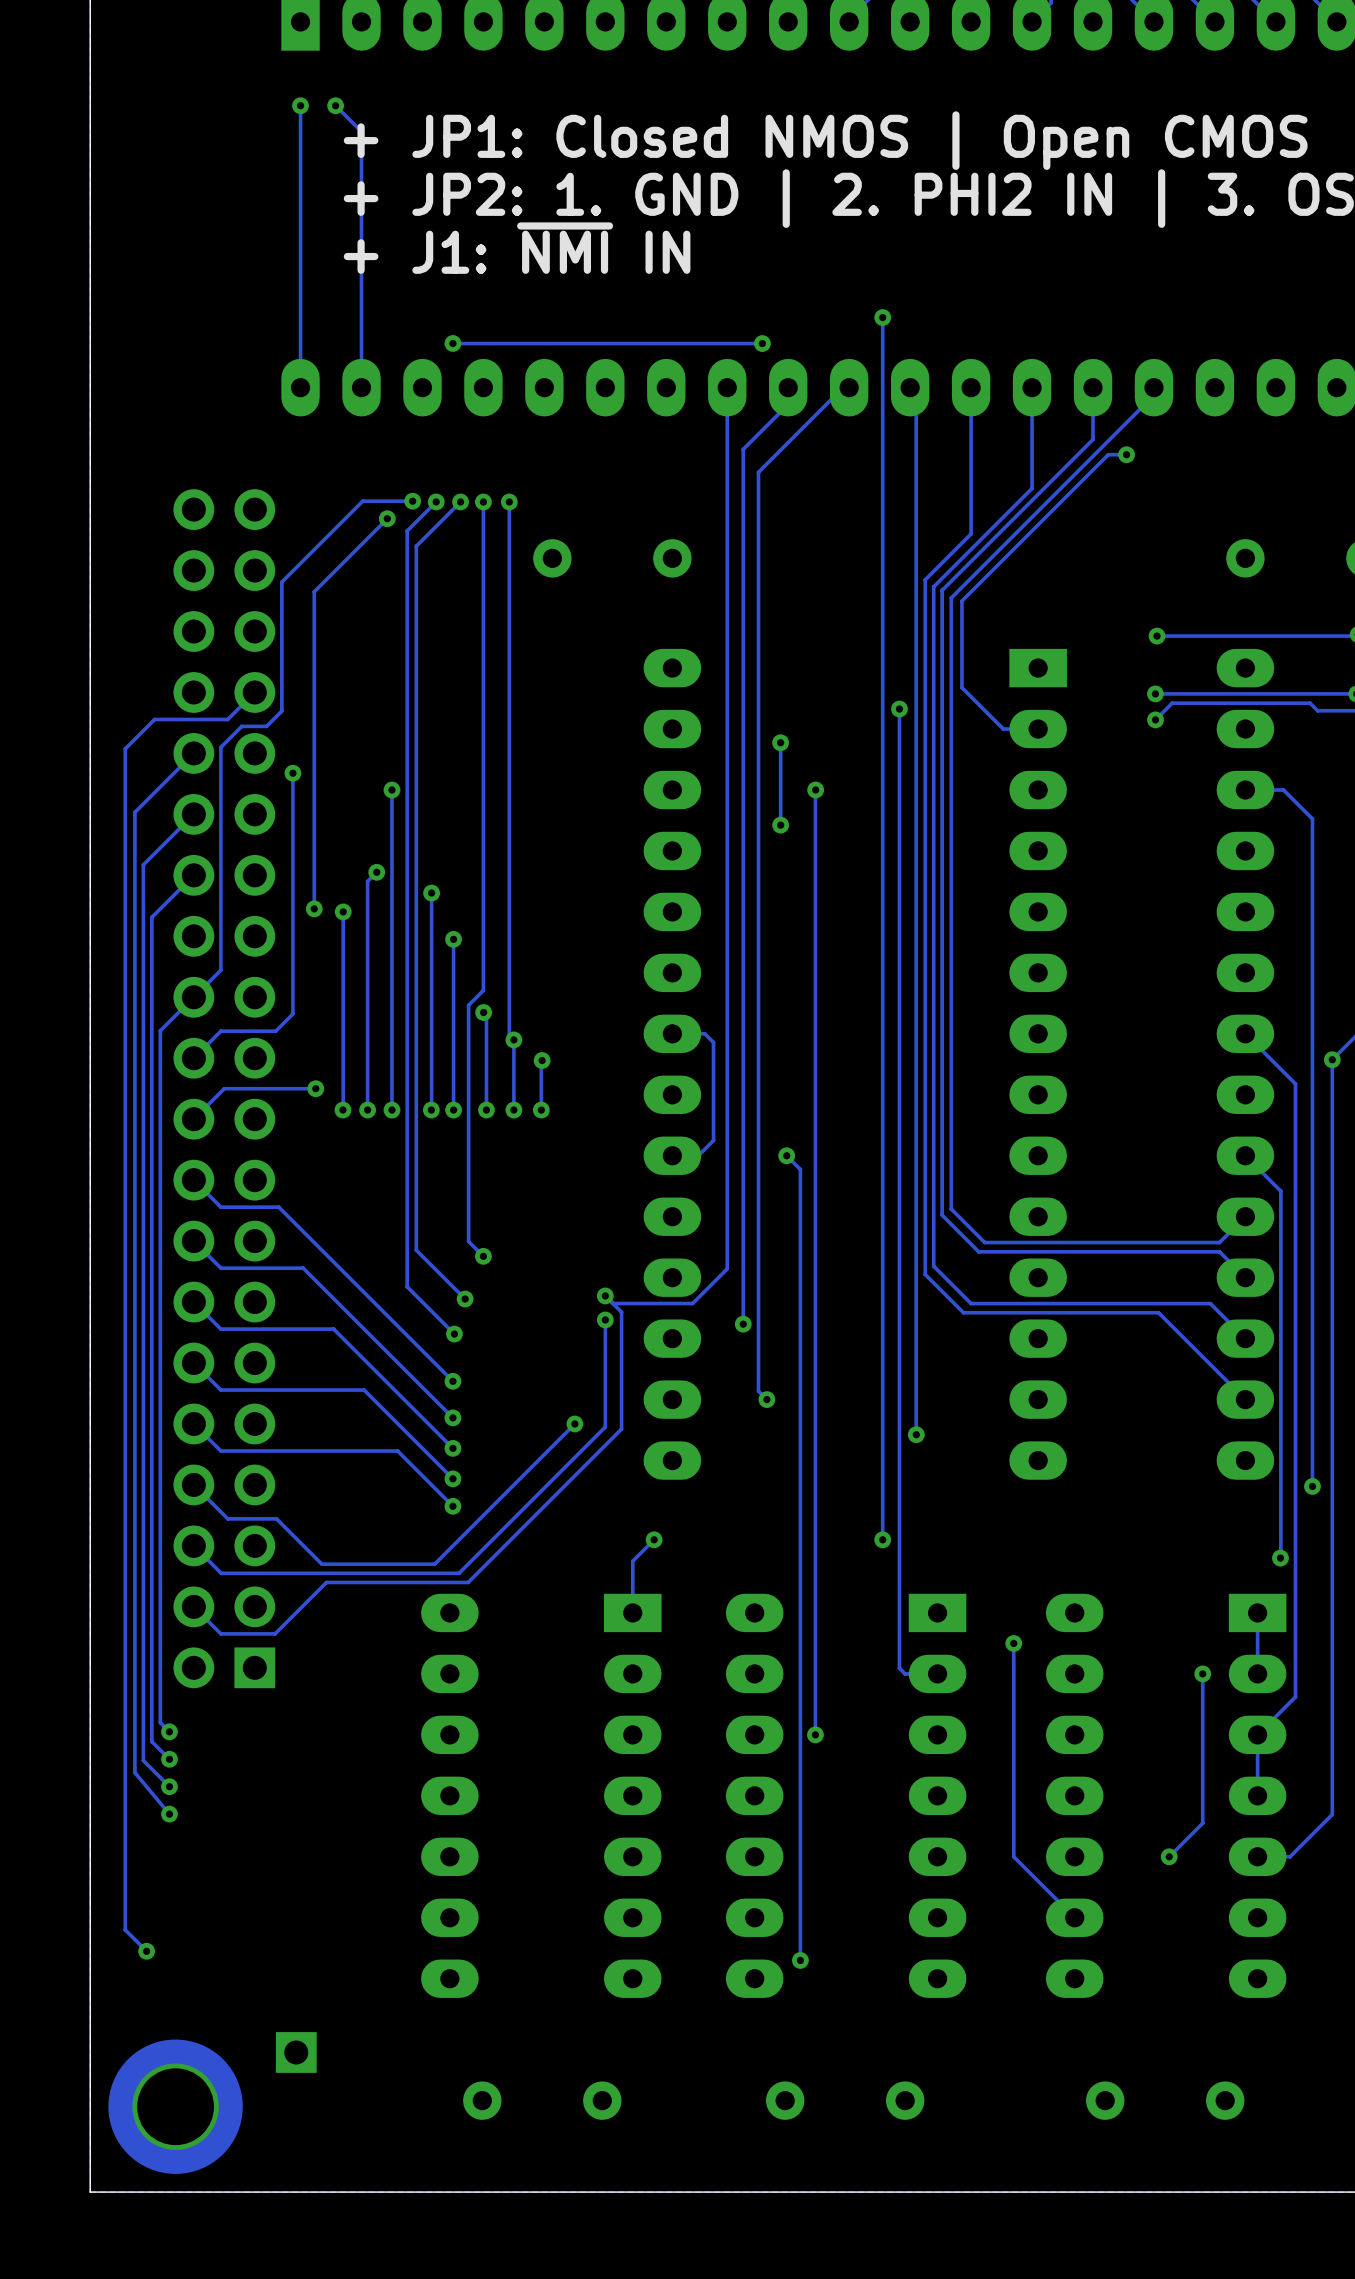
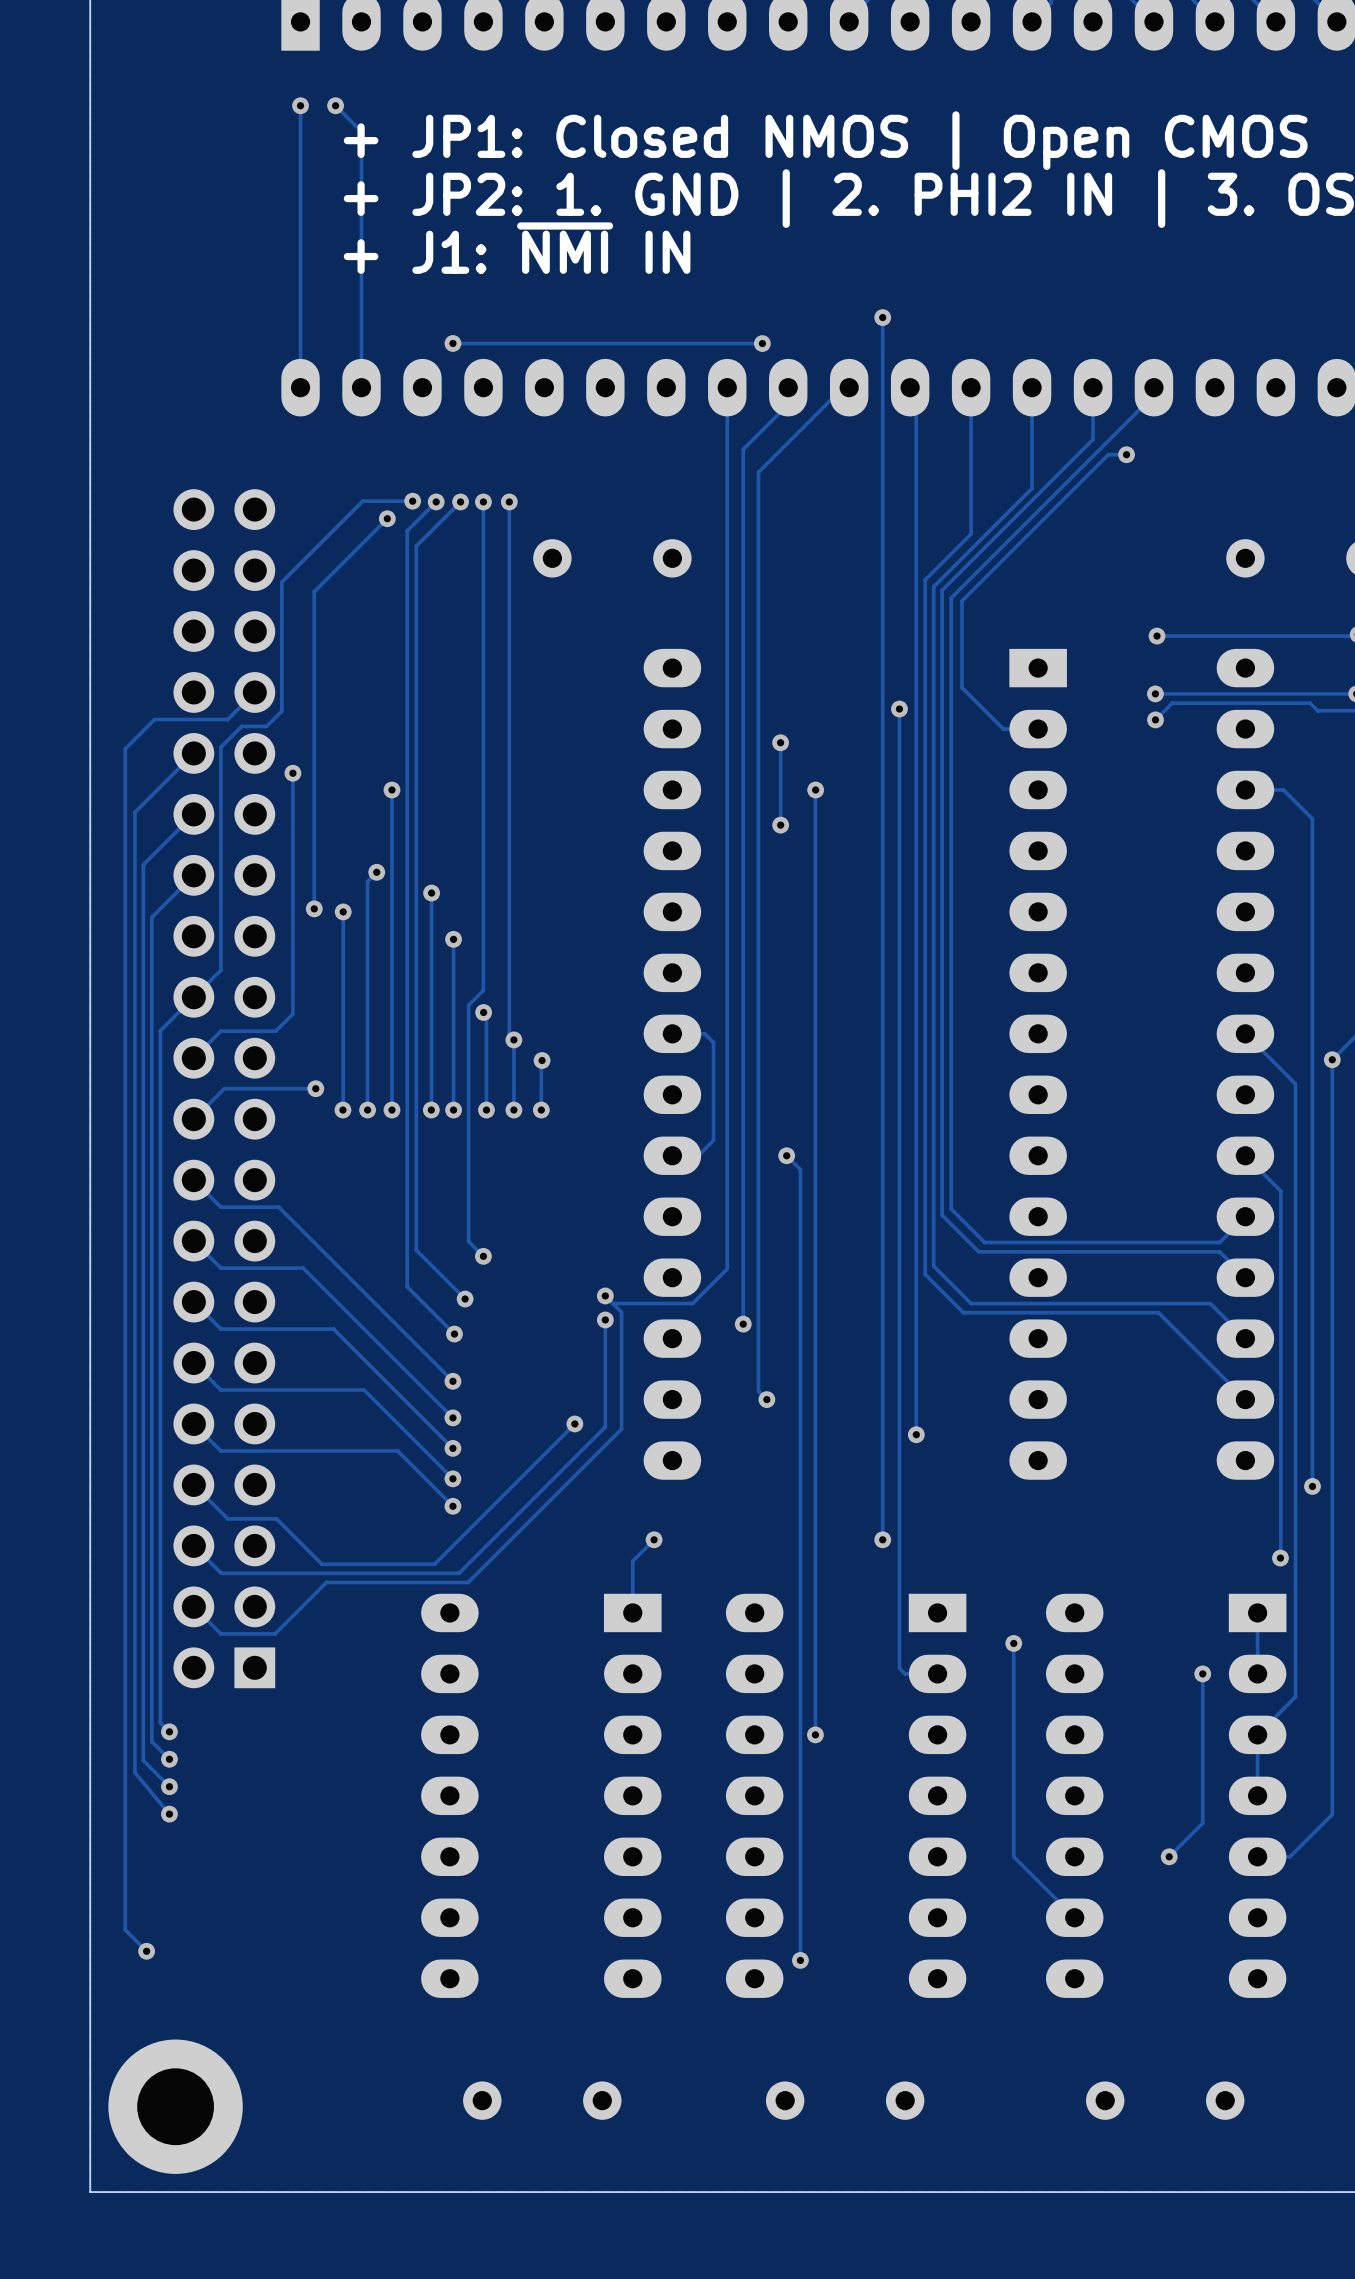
part: (296, 2052) -> none

